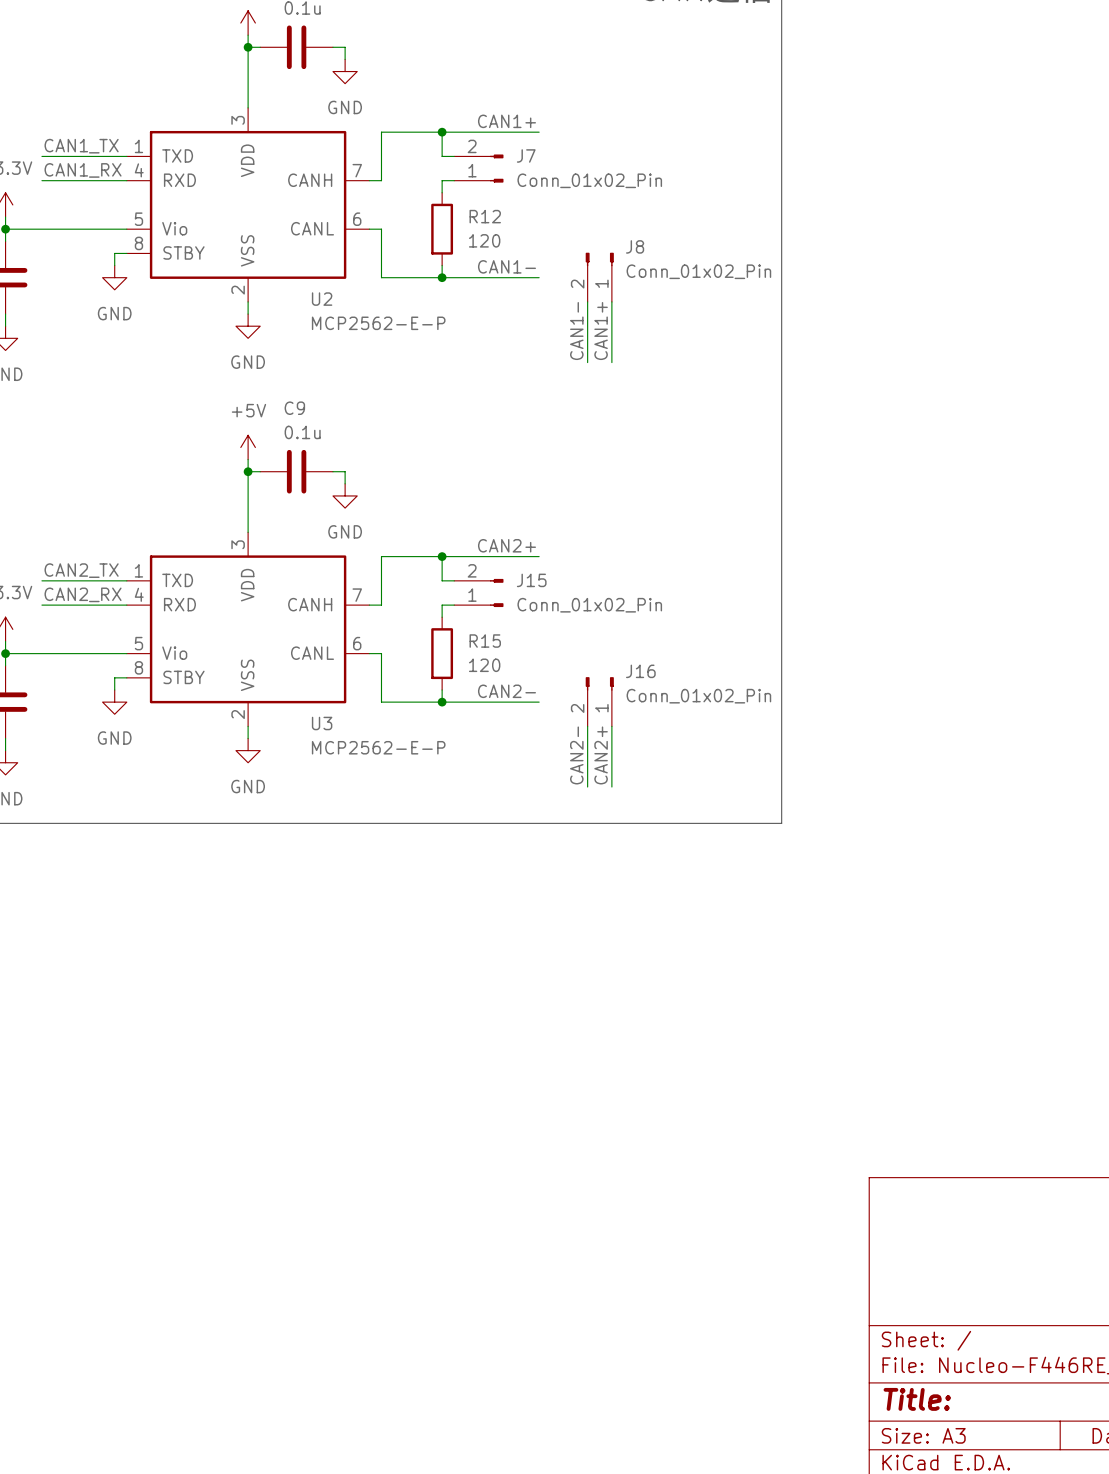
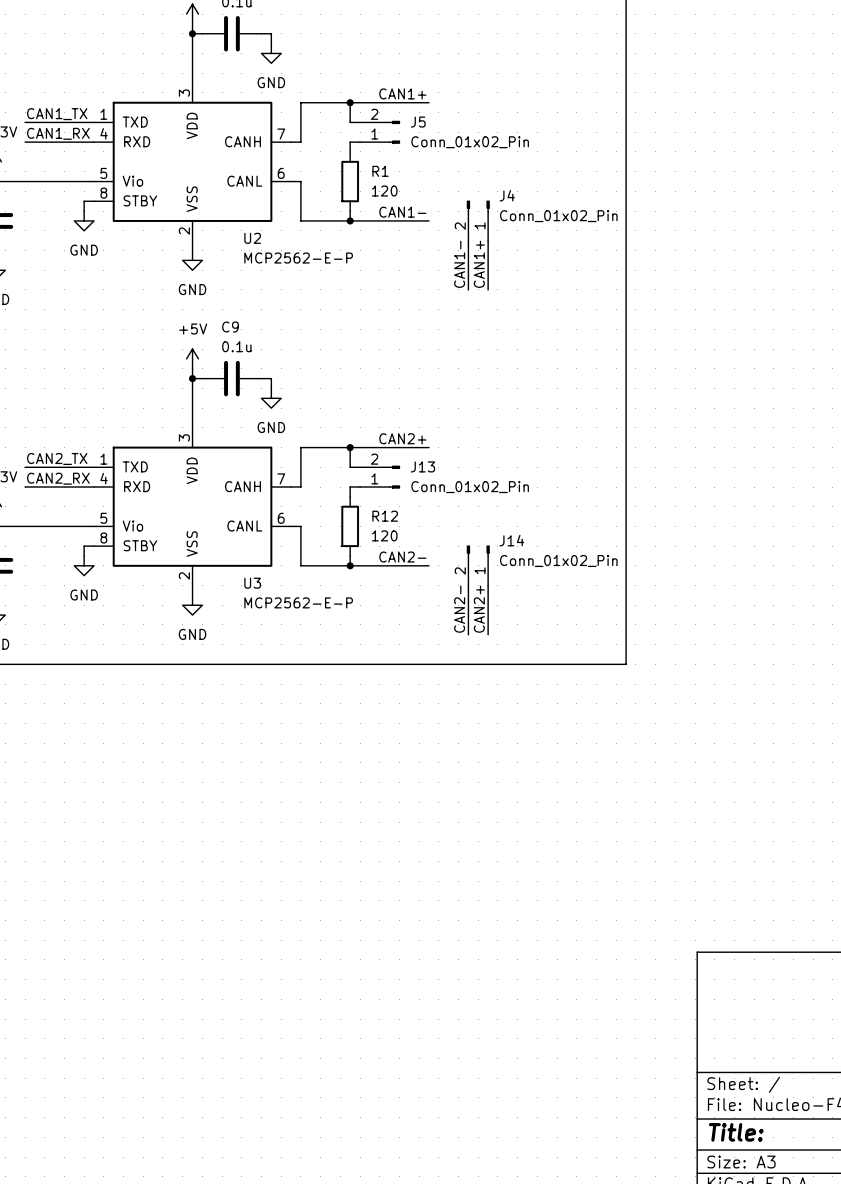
J7 name: J7 (526, 155) -> J5 (418, 122)
R12 name: R12 (485, 216) -> R1 (380, 171)
J8 name: J8 (635, 246) -> J4 (507, 195)
J15 name: J15 (531, 580) -> J13 (422, 466)
R15 name: R15 (485, 641) -> R12 (385, 516)
J16 name: J16 (640, 671) -> J14 (511, 540)

